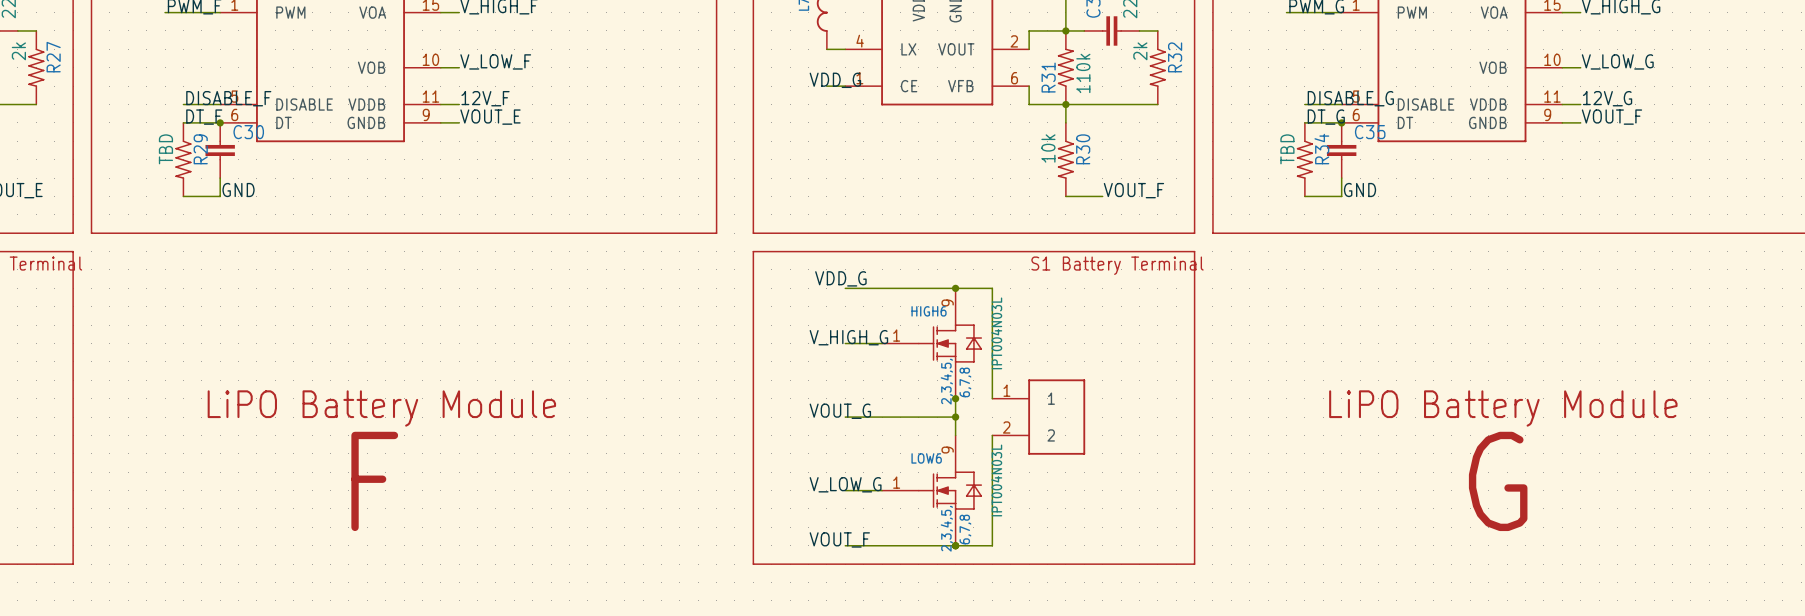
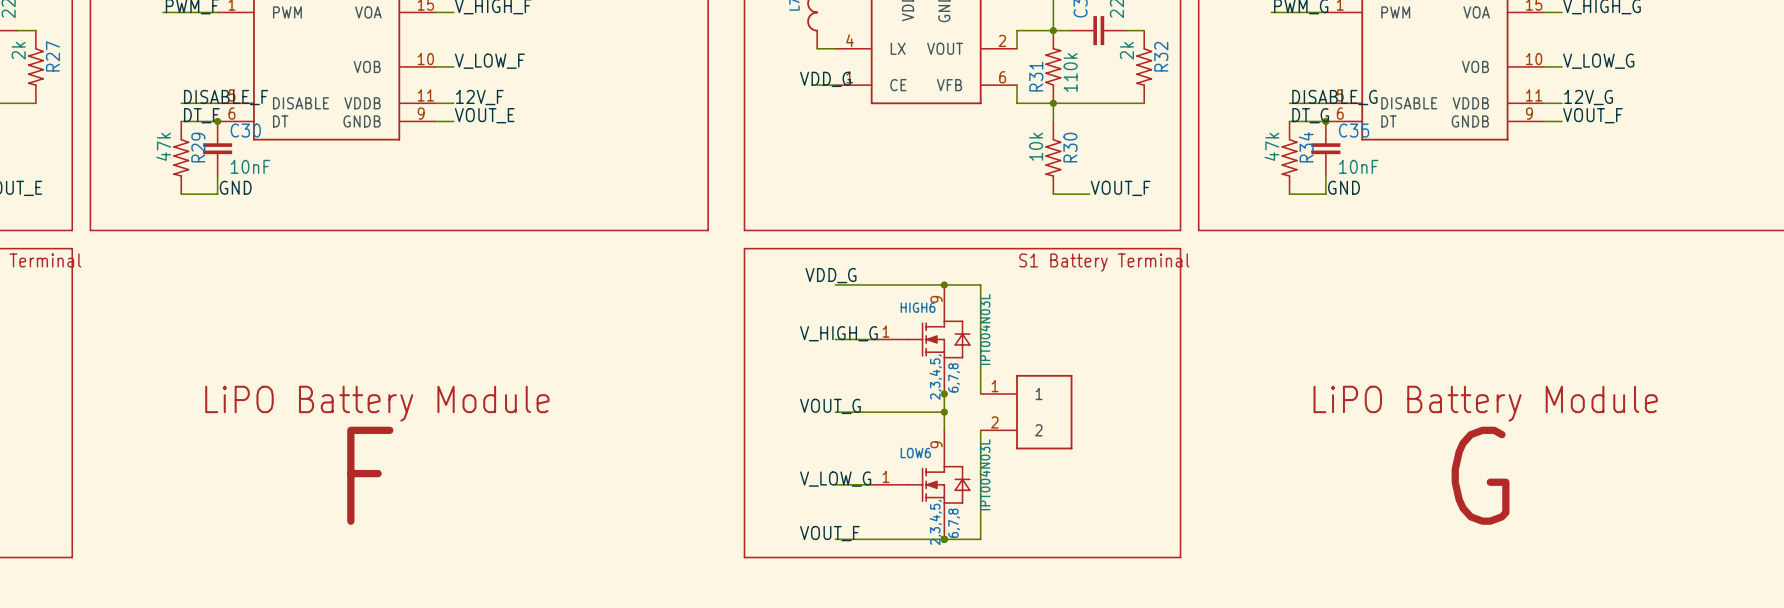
R29 value: TBD (165, 149) -> 47k (163, 146)
R34 value: TBD (1287, 149) -> 47k (1271, 146)
C30 value: none -> 10nF (250, 166)
C35 value: none -> 10nF (1358, 166)

